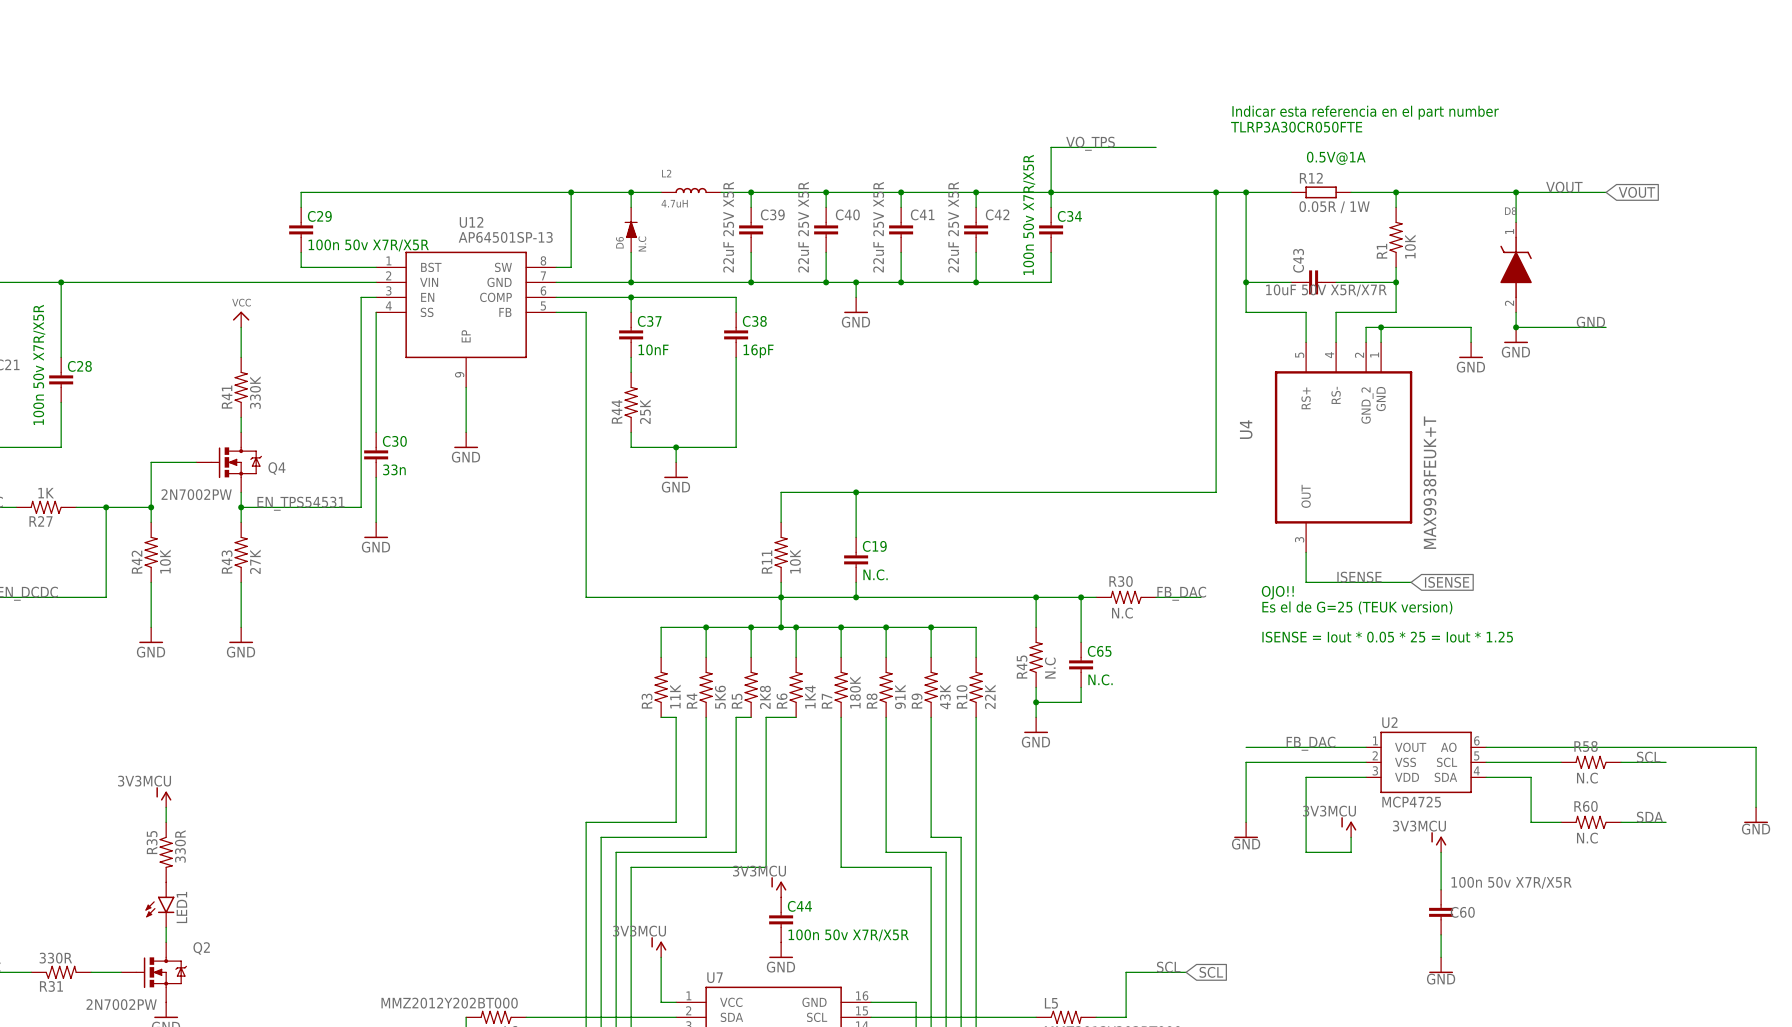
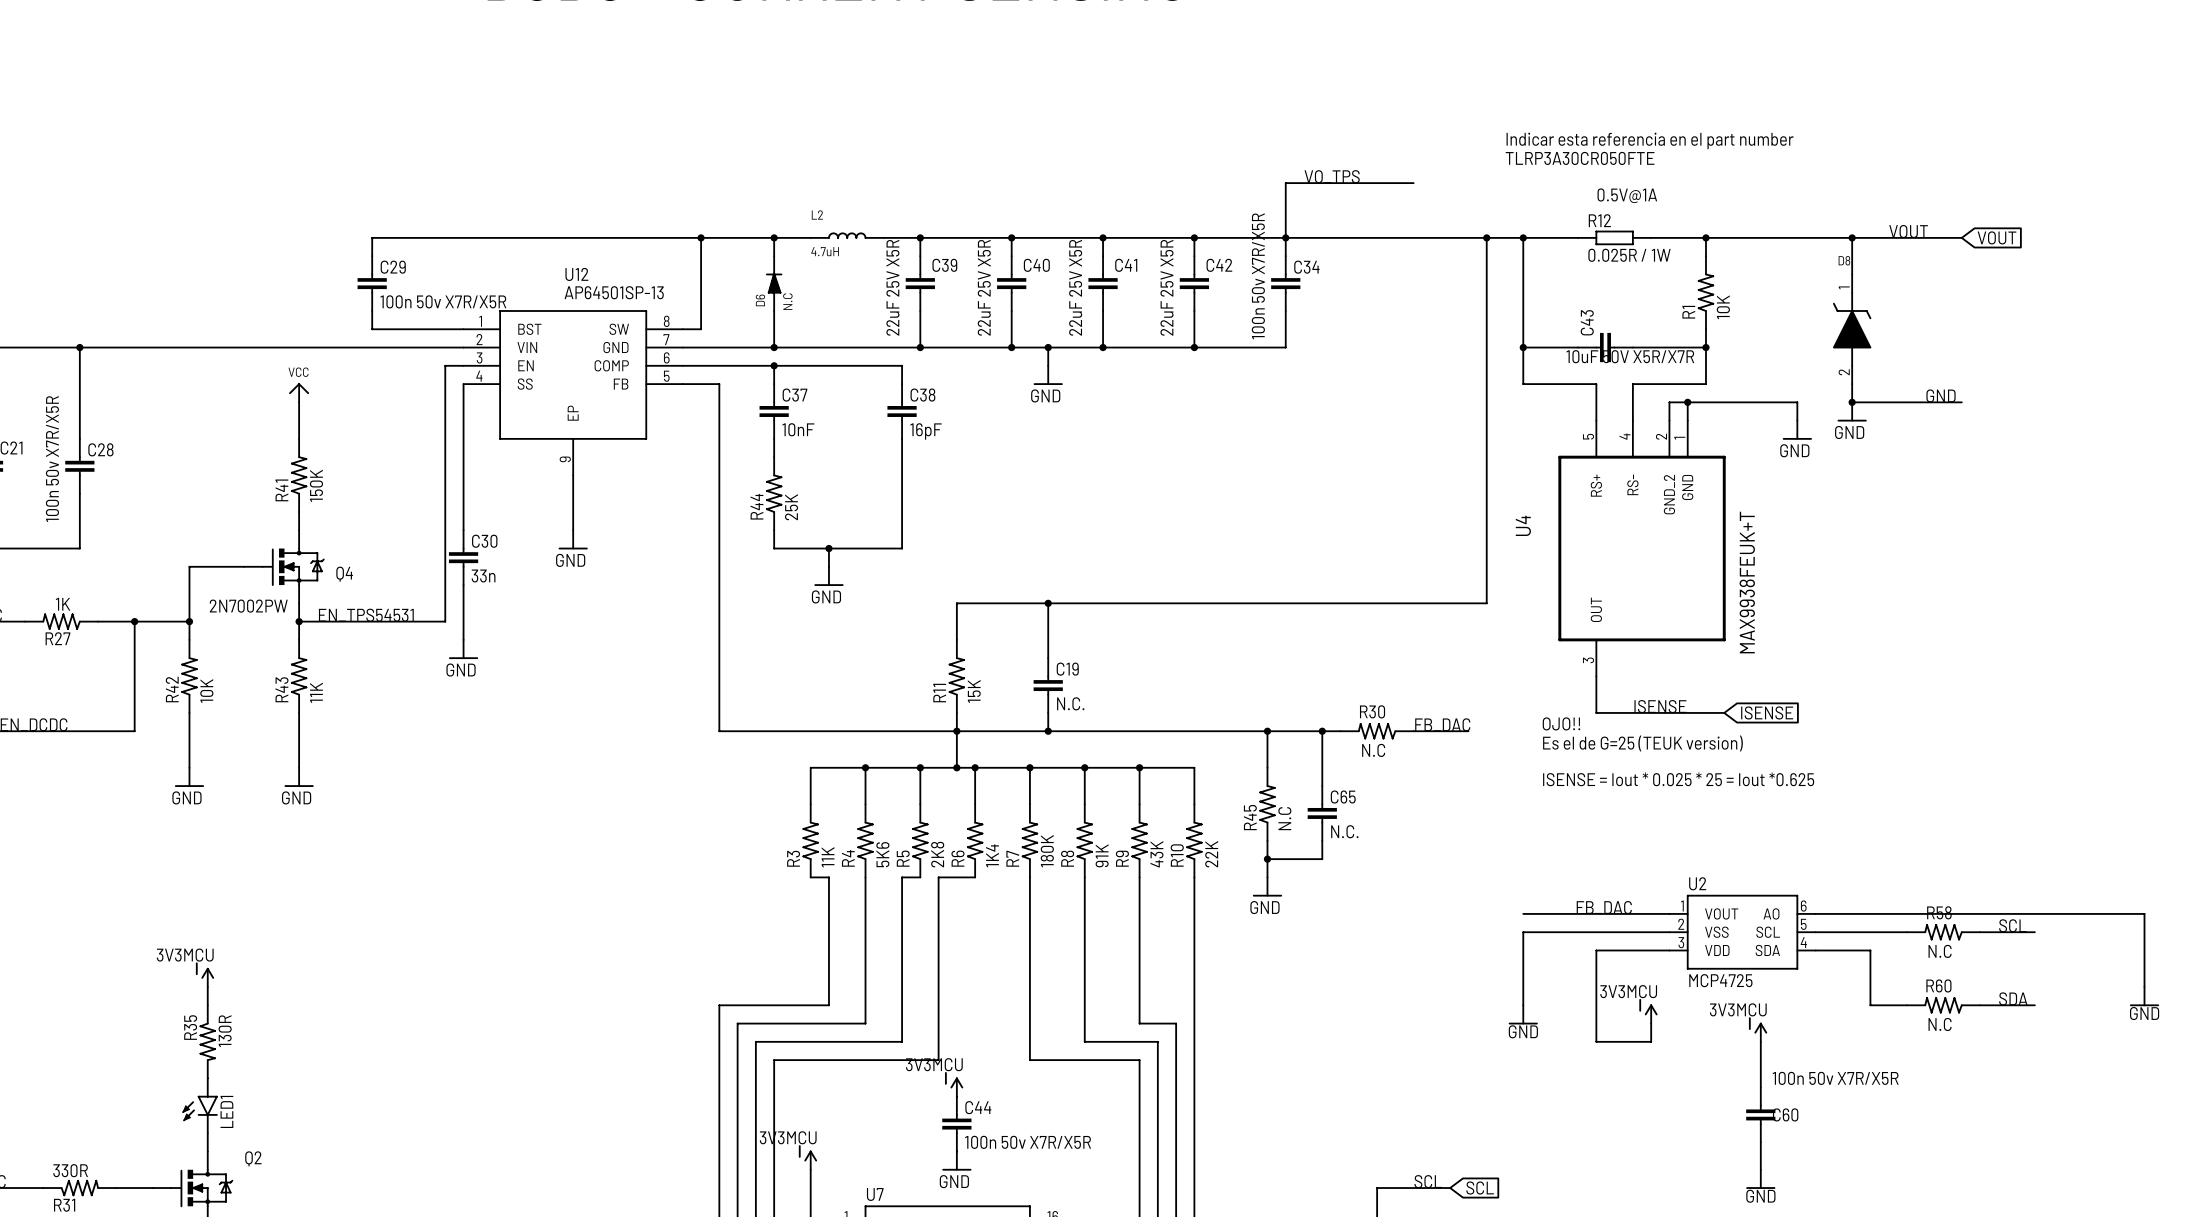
R12 value: 0.05R / 1W (1334, 207) -> 0.025R / 1W (1629, 255)
R41 value: 330K (255, 392) -> 150K (316, 485)
R43 value: 27K (255, 561) -> 11K (316, 692)
R11 value: 10K (795, 561) -> 15K (974, 691)
text: ISENSE = Iout * 0.05 * 25 = Iout * 1.25 (1387, 637) -> ISENSE = Iout * 0.025 * 25 = Iout *0.625 (1678, 779)
R35 value: 330R (180, 846) -> 130R (225, 1031)

